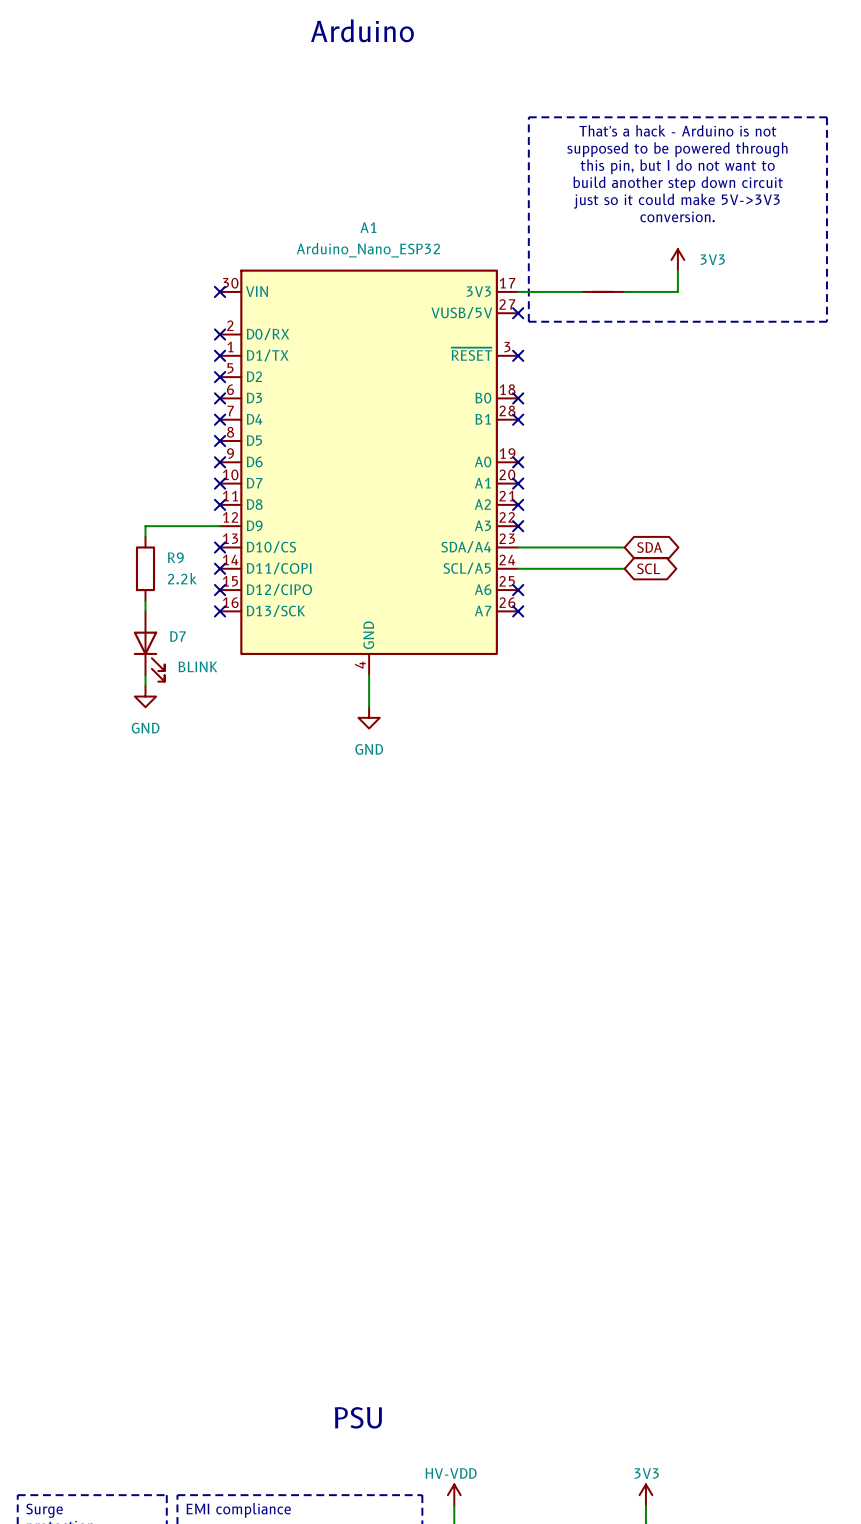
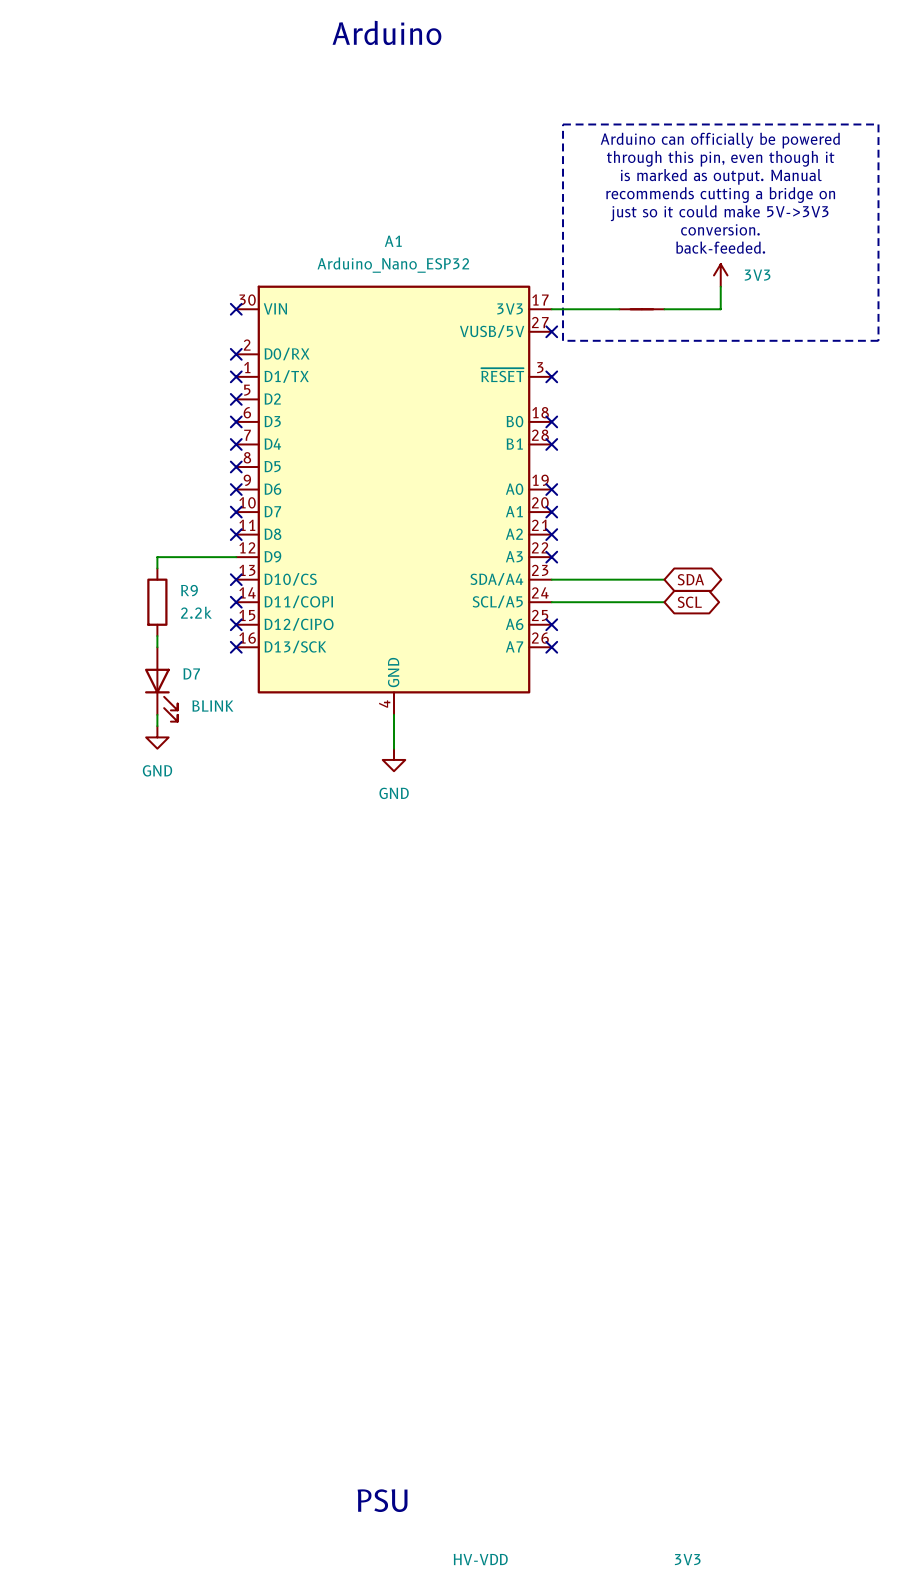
text: That's a hack - Arduino is not (677, 130) -> Arduino can officially be powered (720, 140)
text: supposed to be powered through (677, 149) -> through this pin, even though it (720, 158)
text: this pin, but I do not want to (677, 166) -> is marked as output. Manual (721, 176)
text: build another step down circuit (678, 183) -> recommends cutting a bridge on (720, 195)
text: none -> back-feeded. (720, 247)

